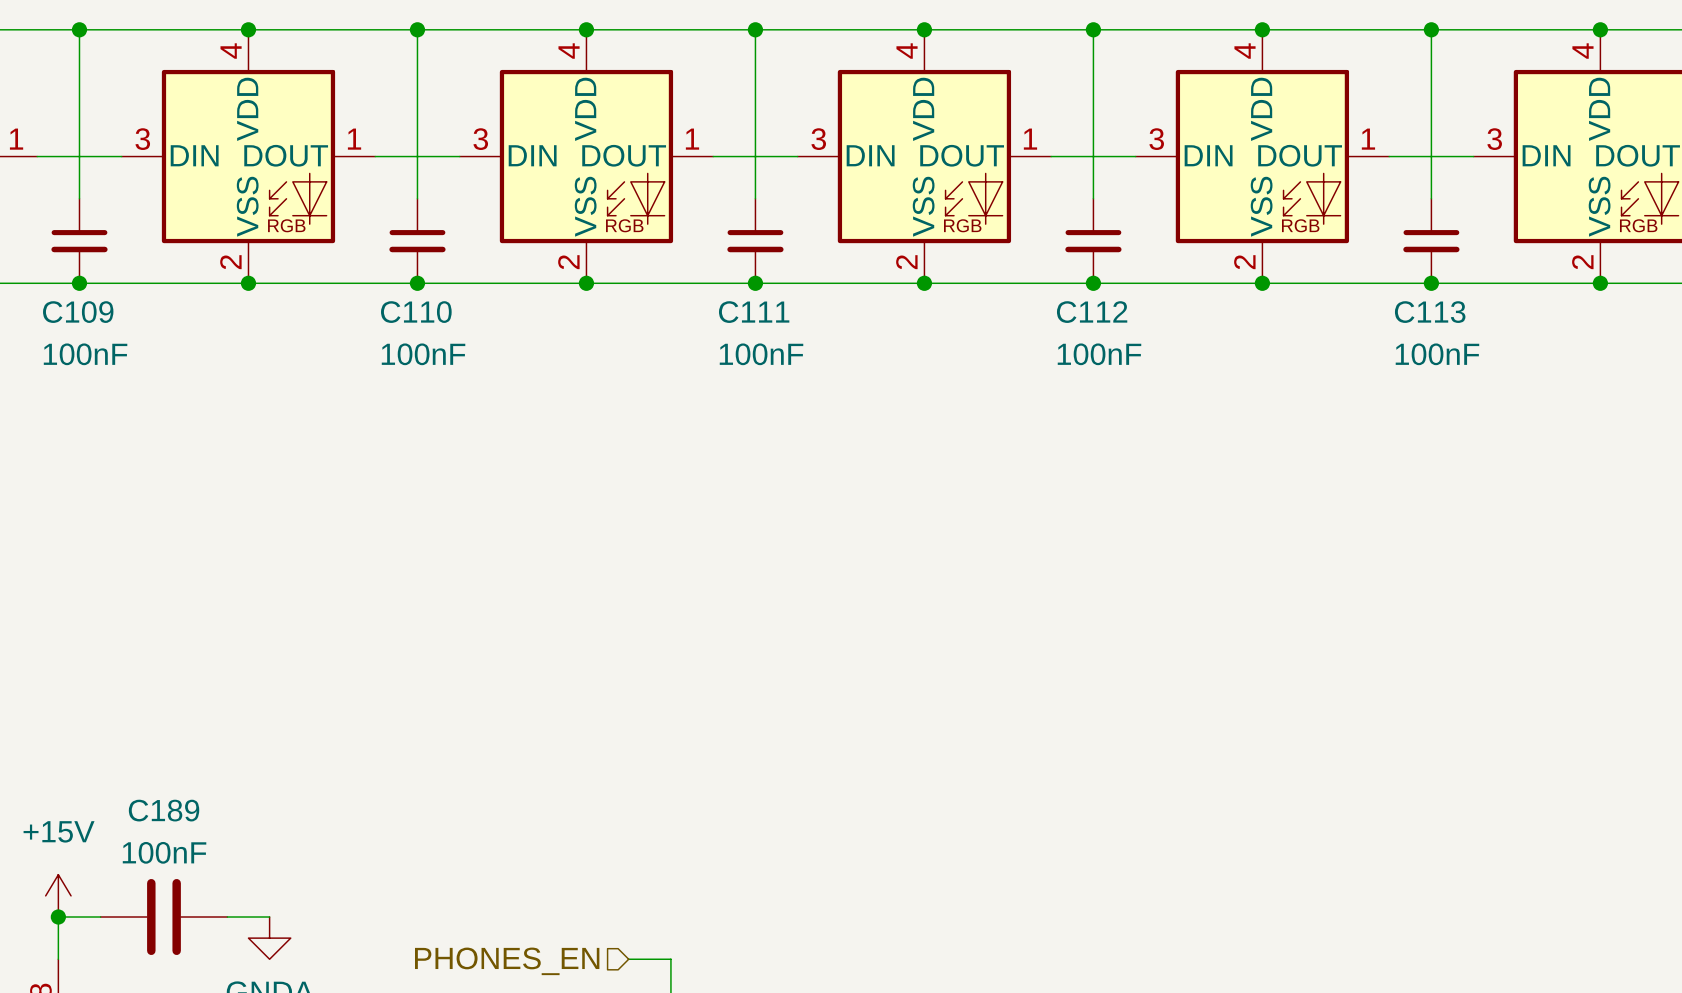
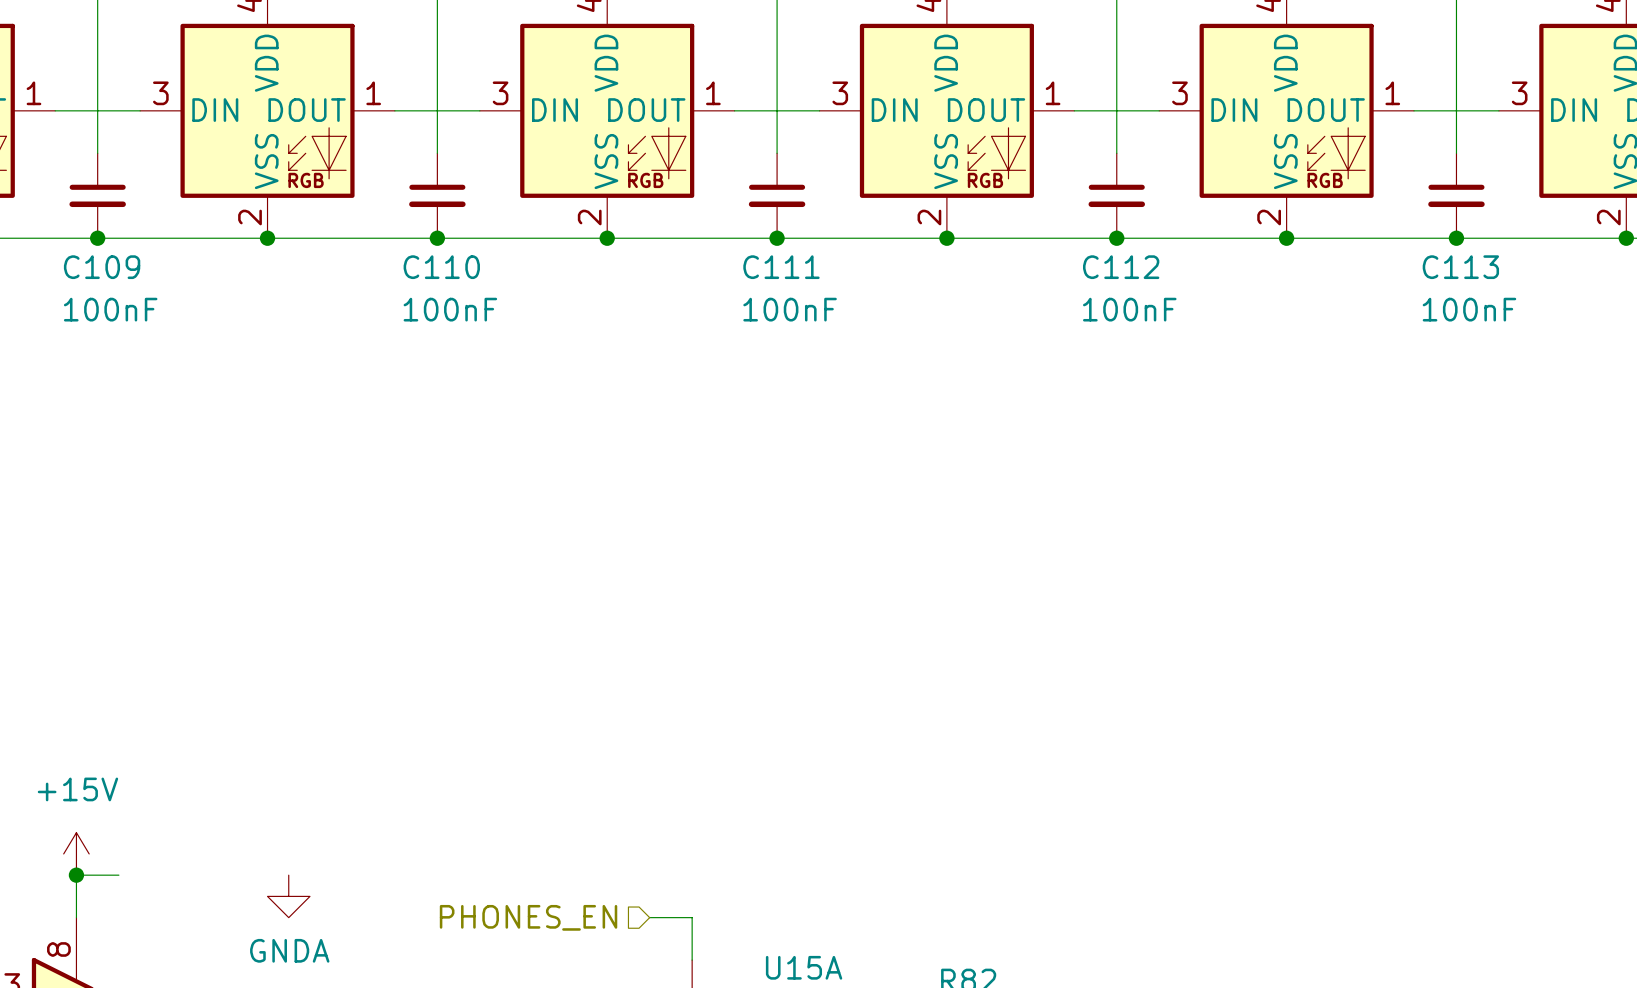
C189: 100nF (163, 917) -> none
wire: (227, 917) (269, 917) -> none

